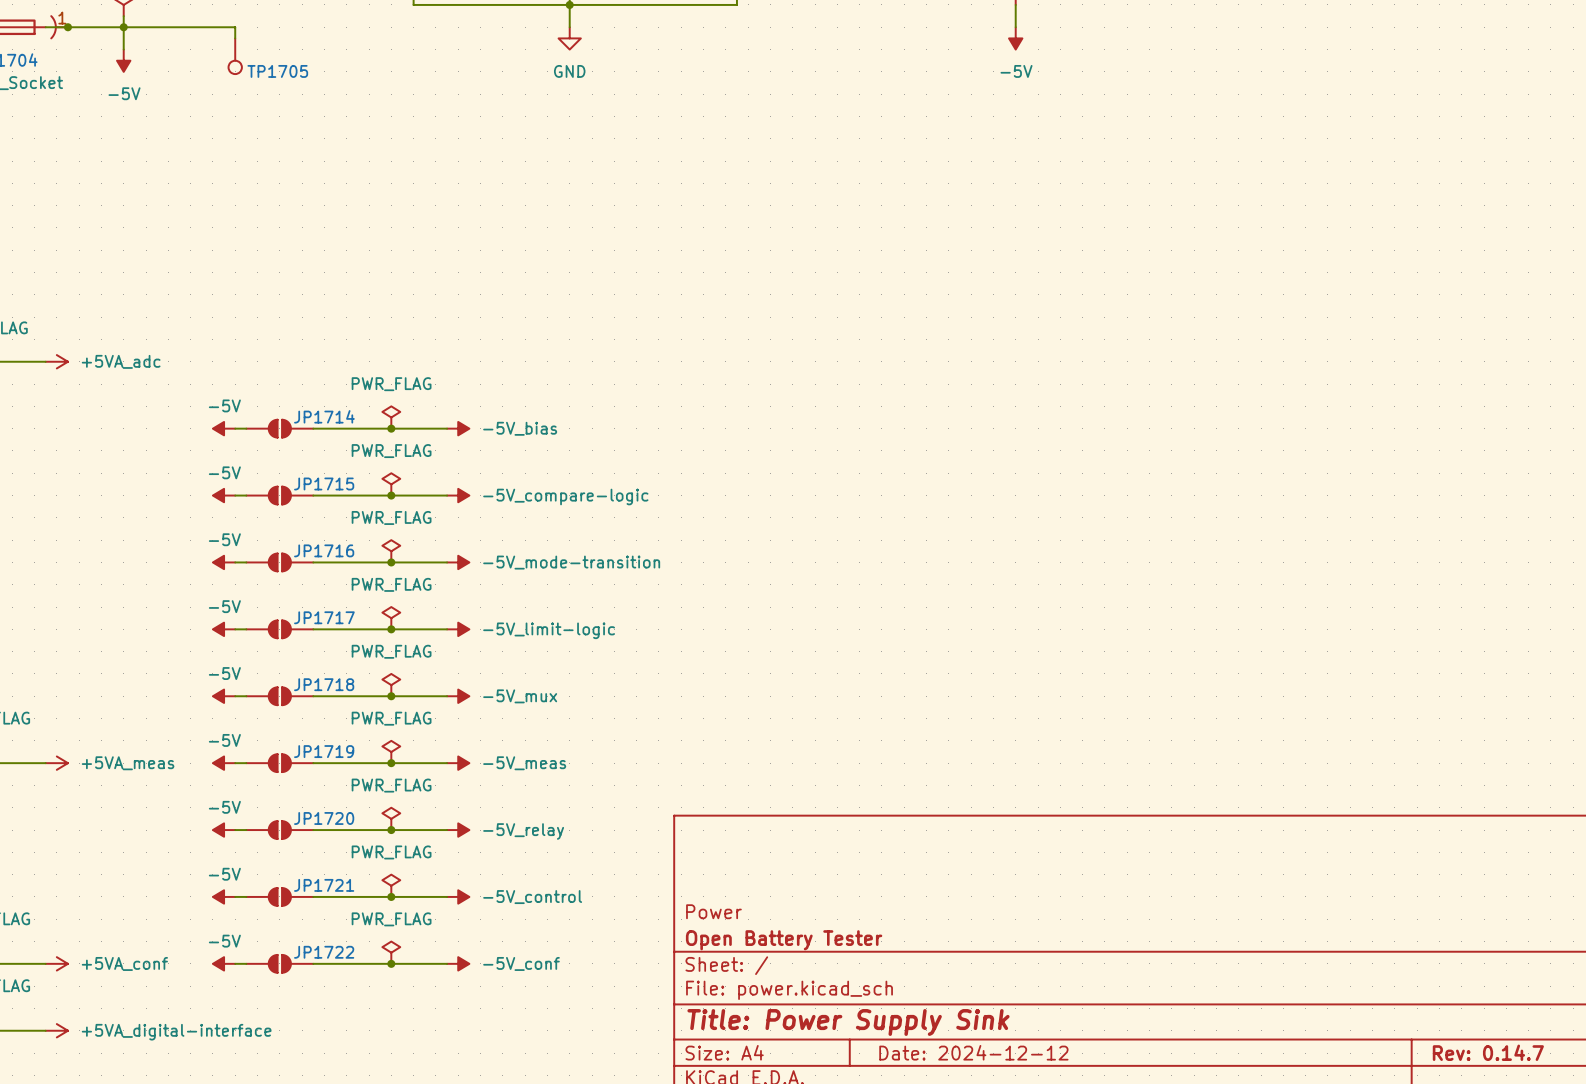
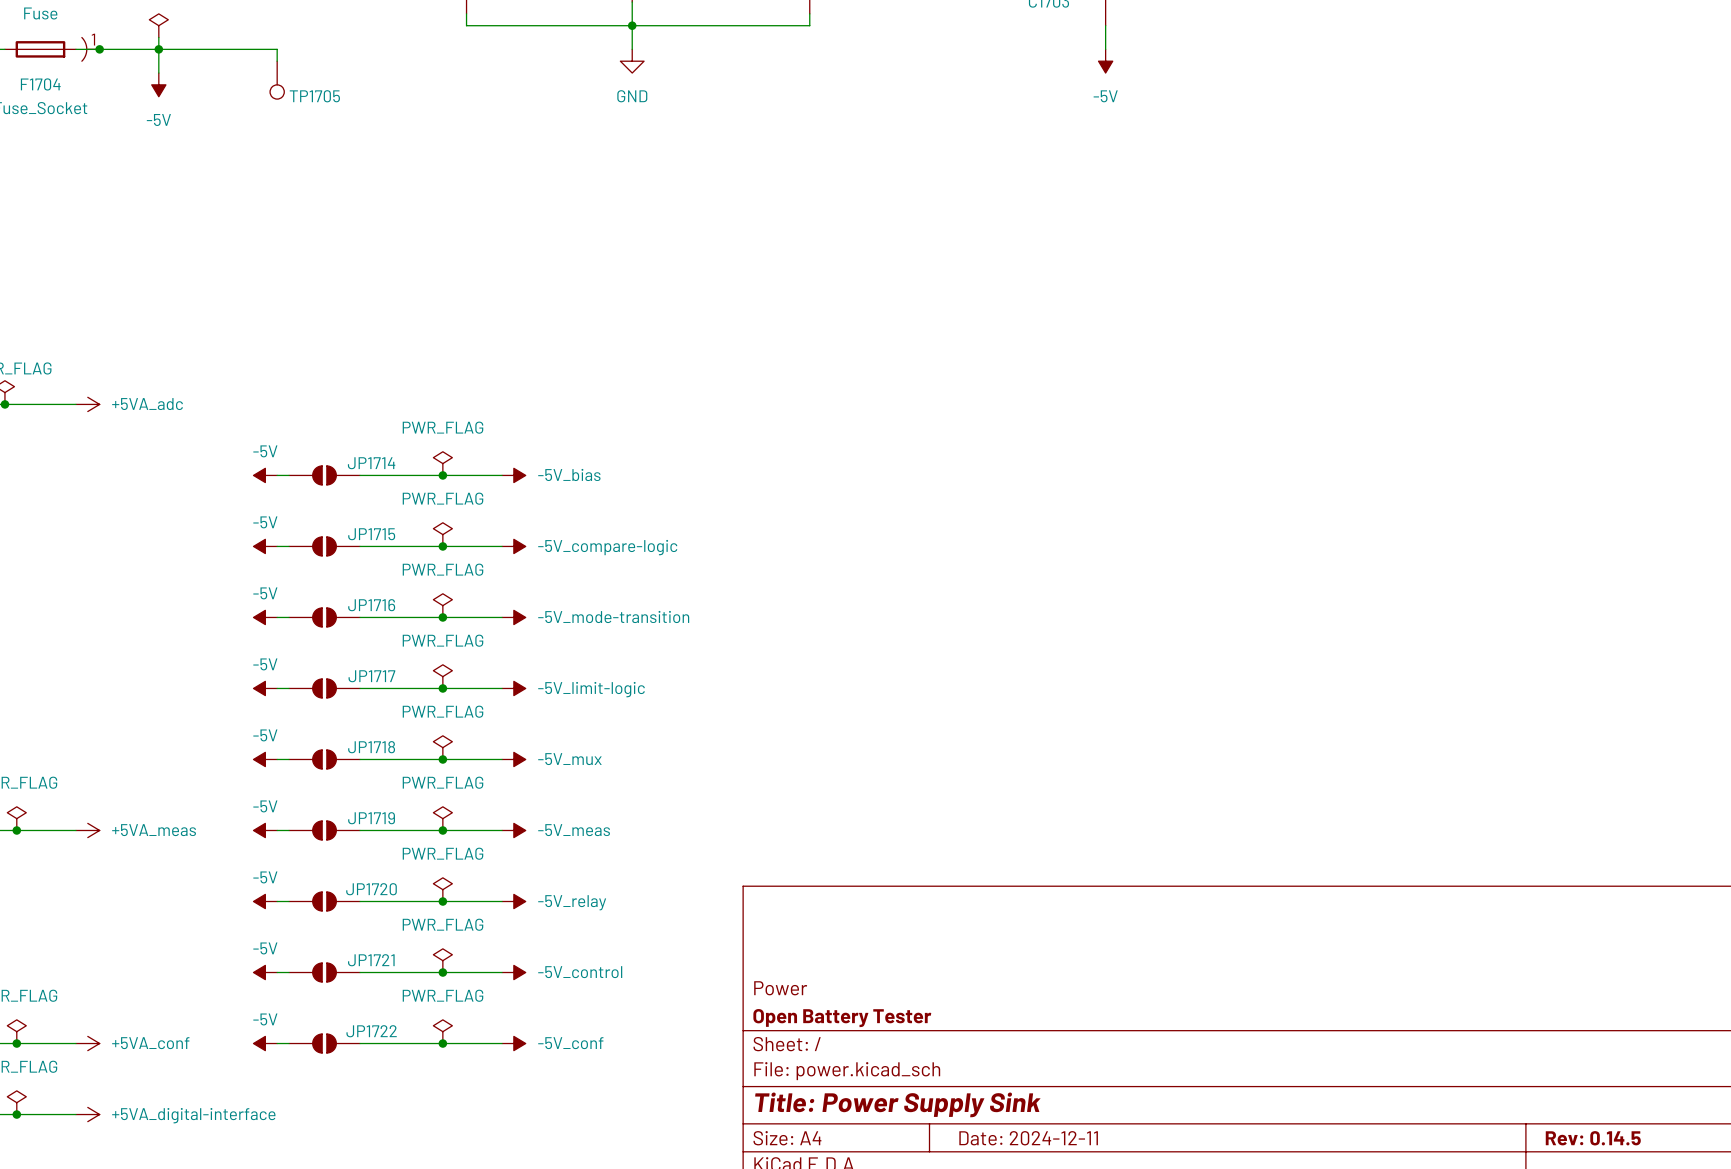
title block: Date: 2024-12-12 (973, 1052) -> Date: 2024-12-11 (1028, 1138)
title block: Rev: 0.14.7 (1488, 1052) -> Rev: 0.14.5 (1593, 1138)

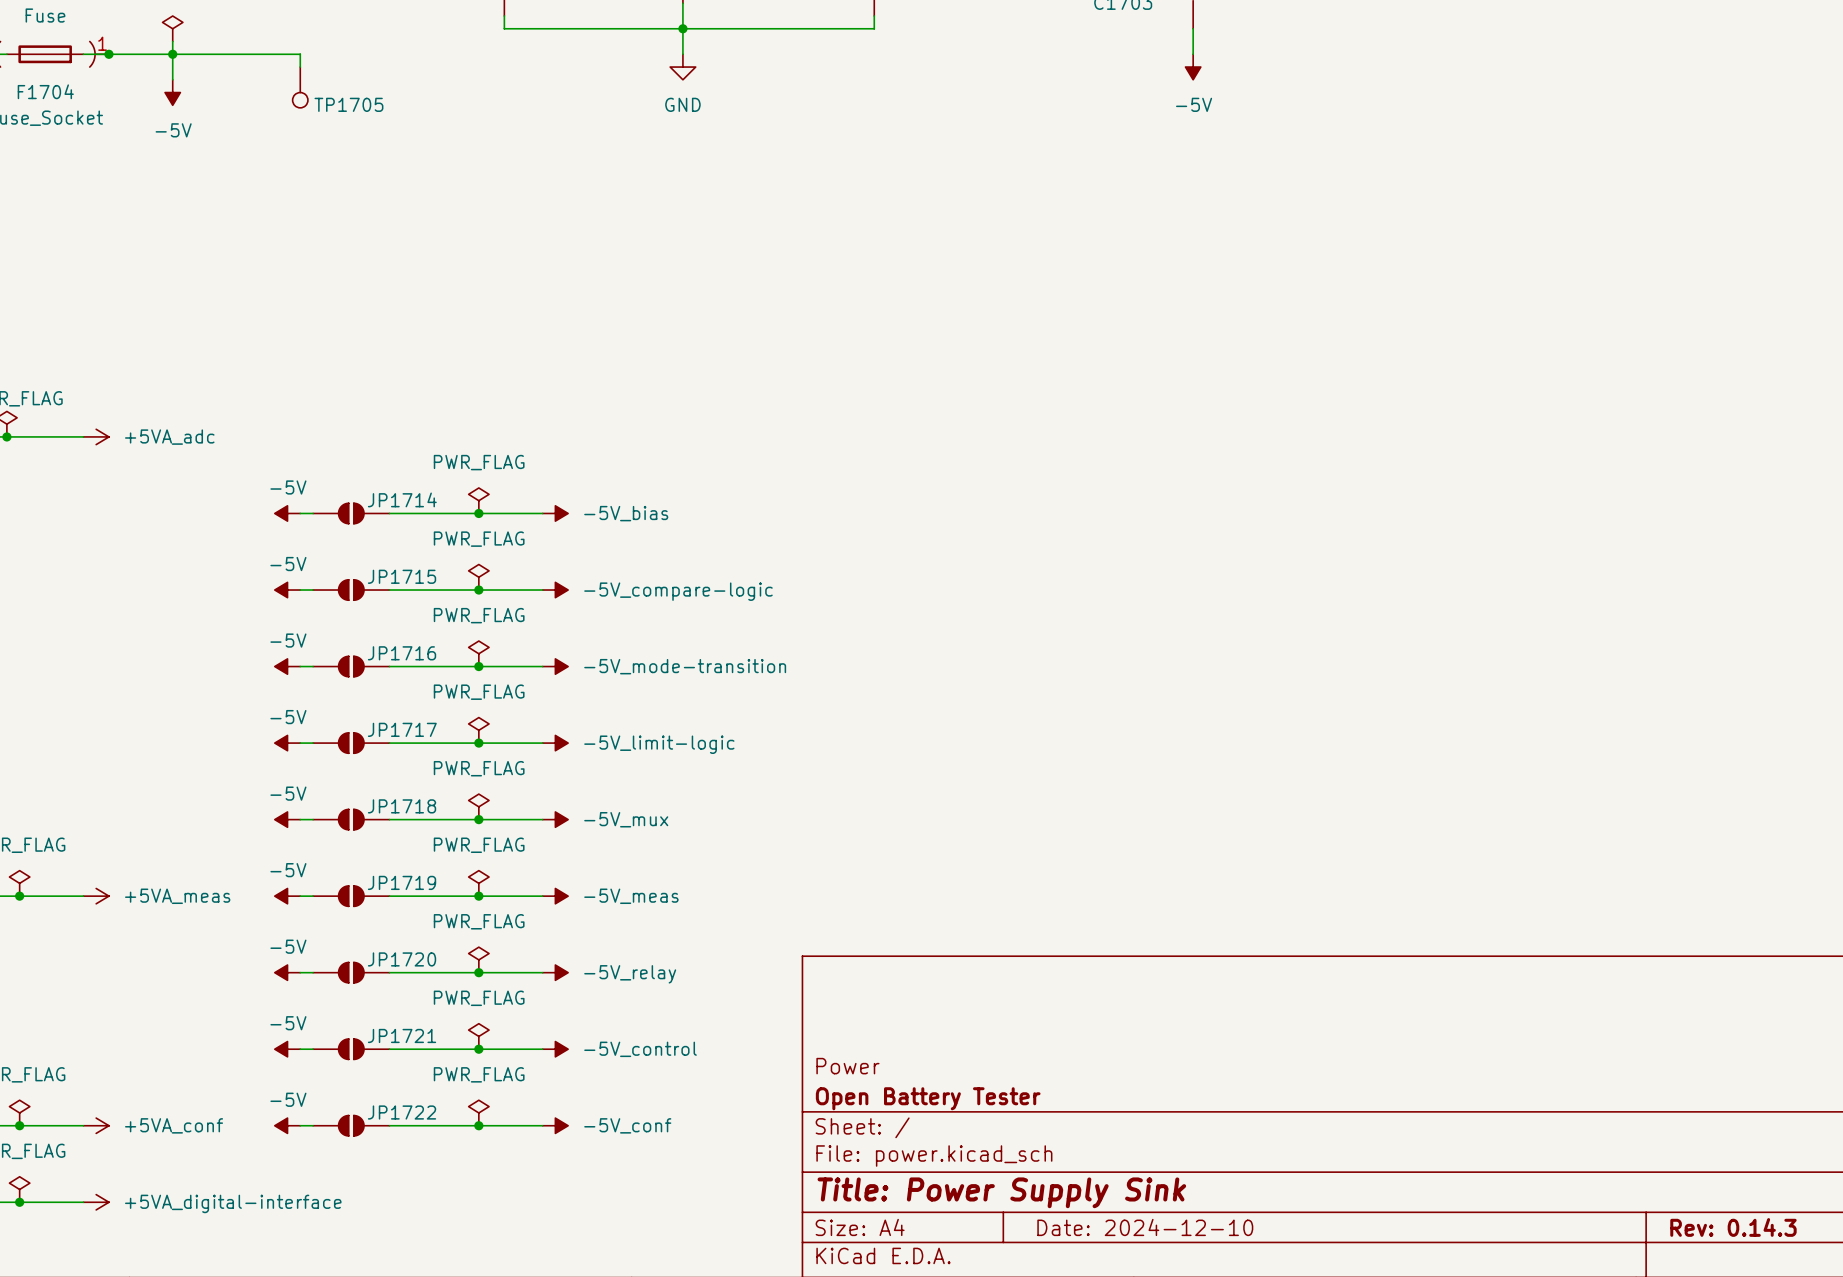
title block: Date: 2024-12-11 (1028, 1138) -> Date: 2024-12-10 (1145, 1227)
title block: Rev: 0.14.5 (1593, 1138) -> Rev: 0.14.3 (1733, 1227)

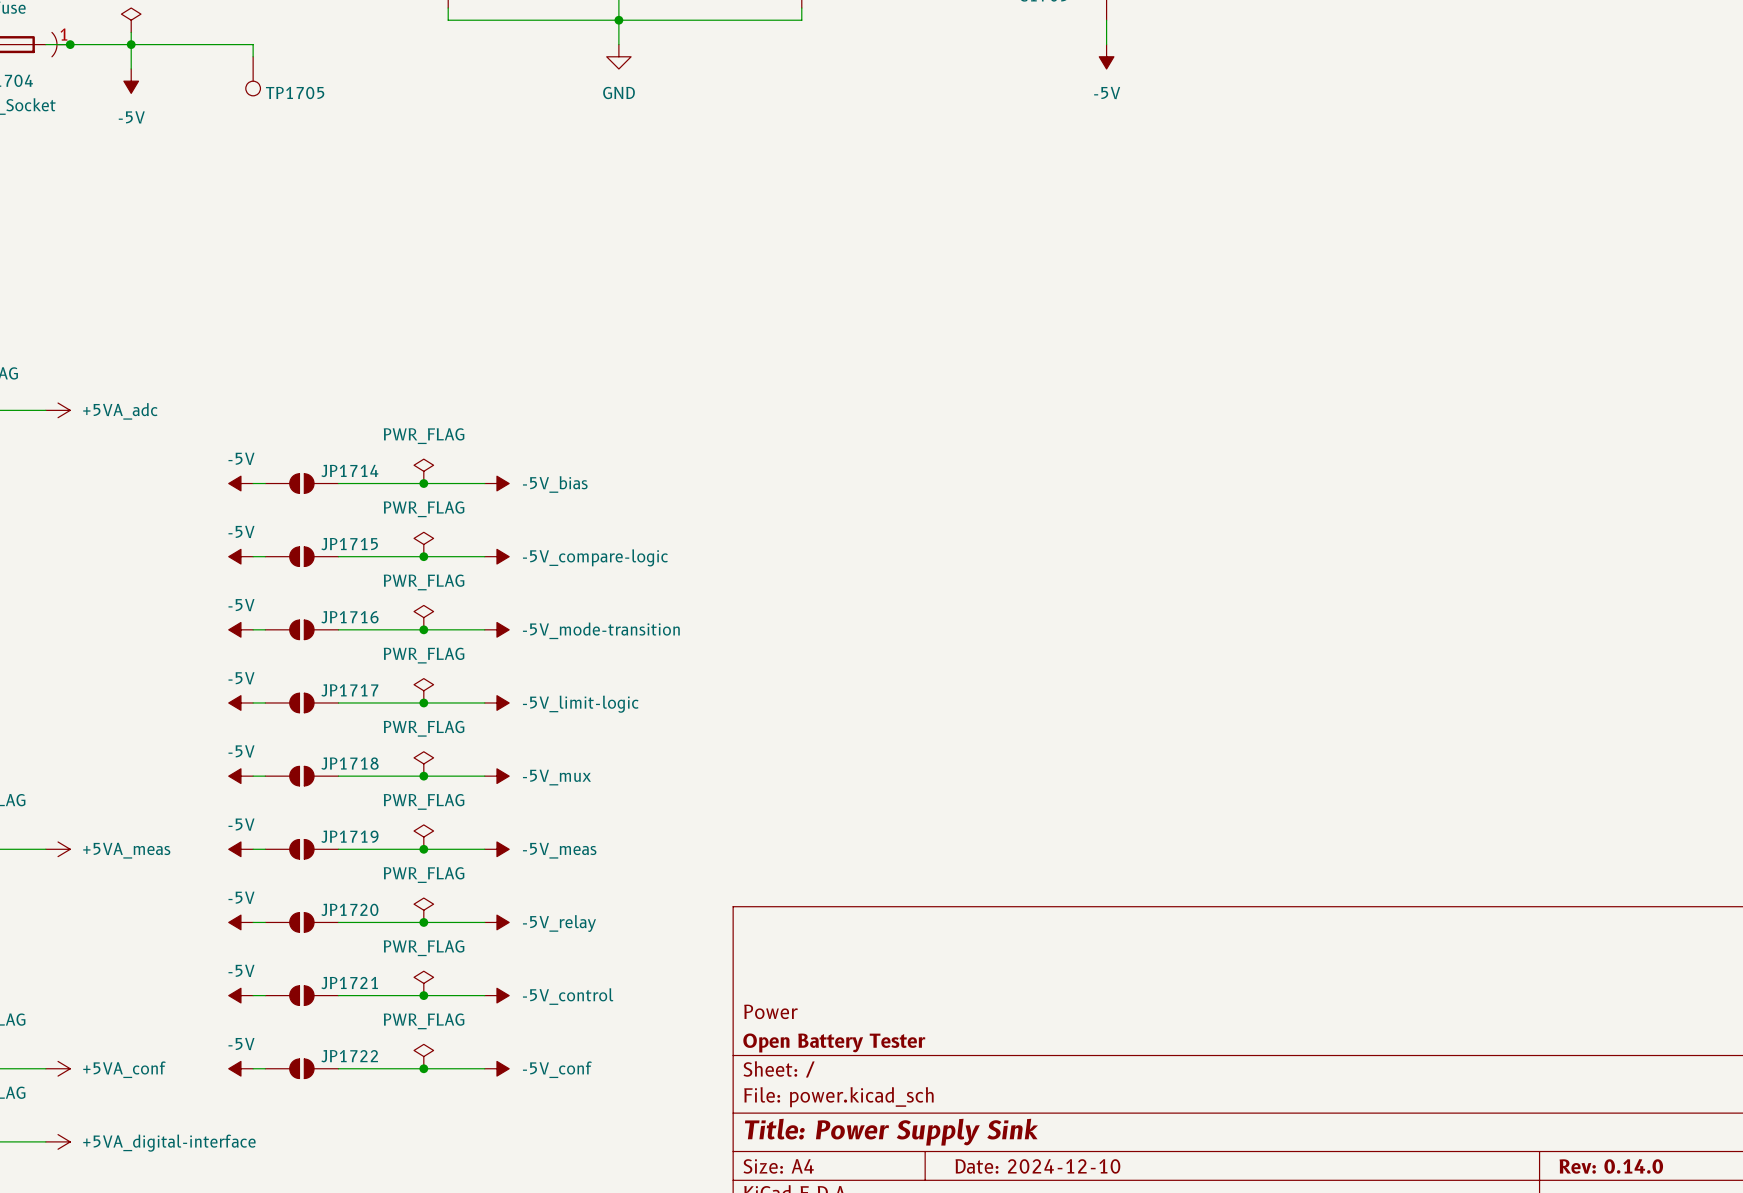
title block: Rev: 0.14.3 (1733, 1227) -> Rev: 0.14.0 (1611, 1166)

